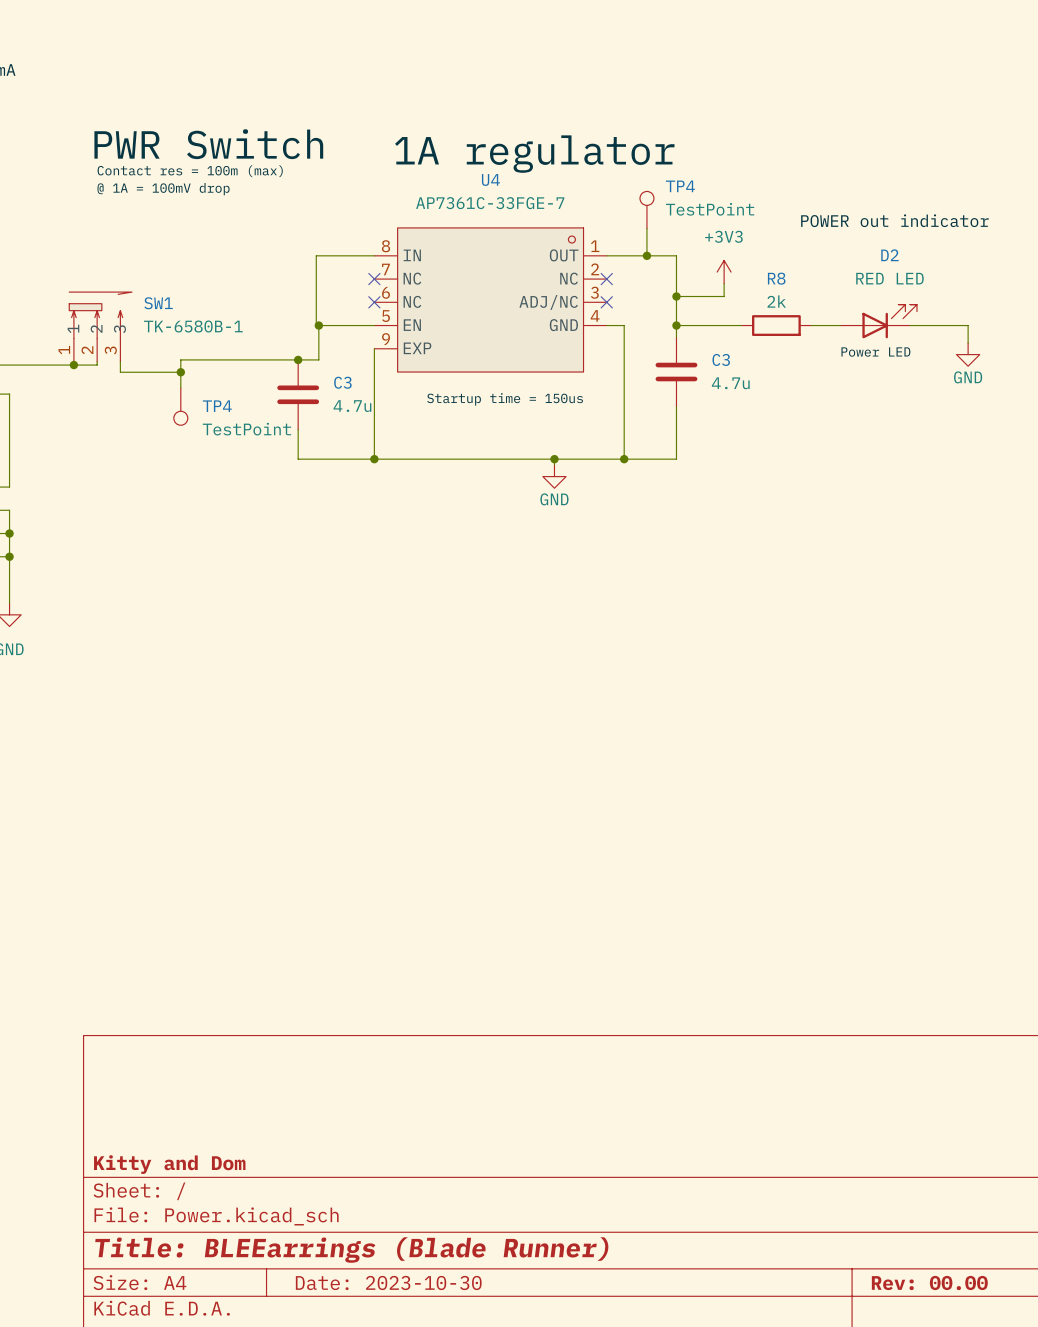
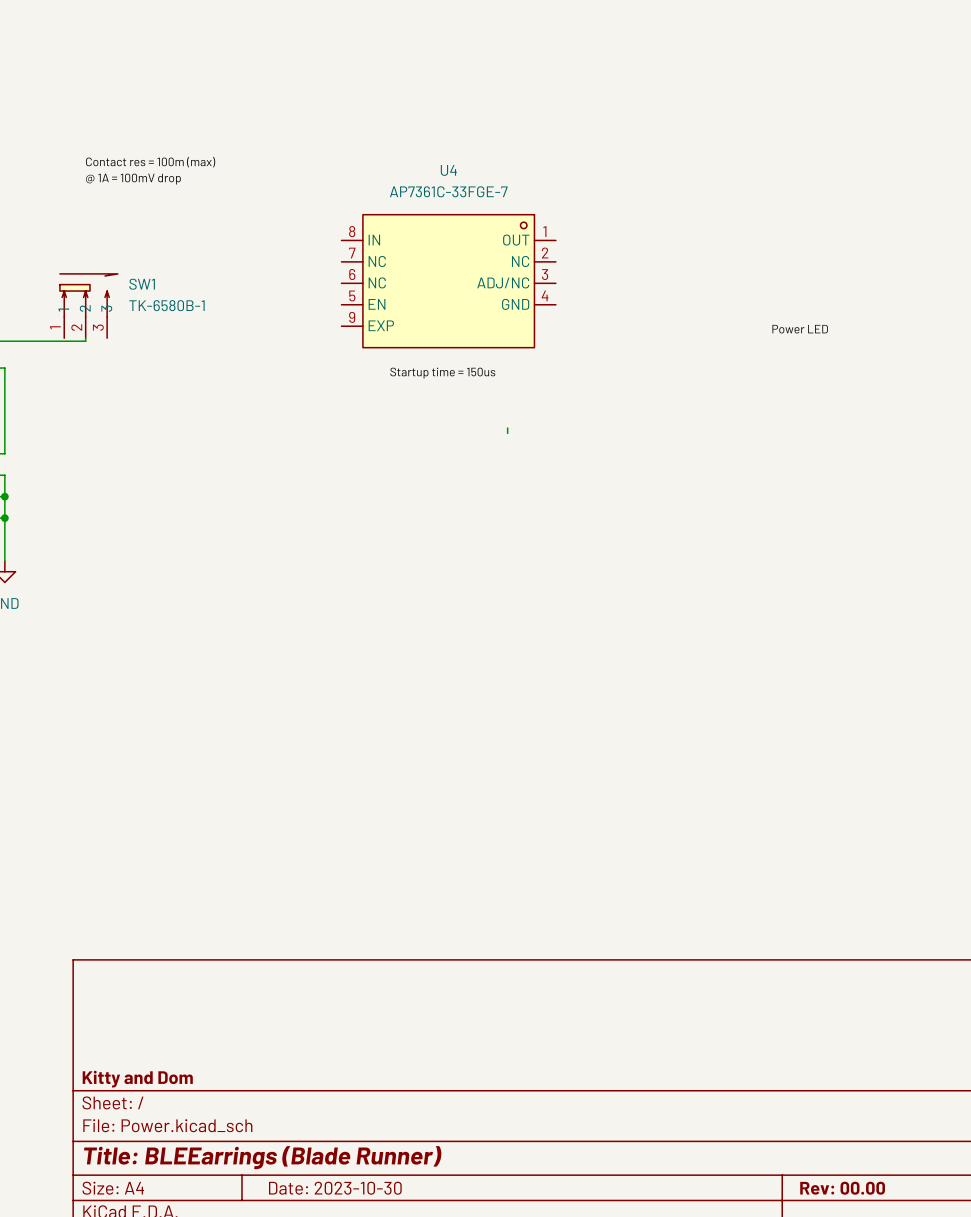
label: PWR Switch (208, 144) -> none
label: 1A regulator (534, 154) -> none
TP4: TestPoint (646, 210) -> none
label: POWER out indicator (894, 220) -> none
wire: (646, 228) (646, 255) -> none
wire: (374, 255) (316, 255) (316, 325) (374, 325) -> none
wire: (606, 255) (676, 255) (676, 337) -> none
junction: (646, 255) -> none
power symbol: +3V3 (724, 272) -> none
no-connect mark: (374, 279) -> none
no-connect mark: (606, 279) -> none
wire: (724, 283) (724, 296) (676, 296) -> none
junction: (676, 296) -> none
no-connect mark: (374, 302) -> none
no-connect mark: (606, 302) -> none
D2: RED LED (878, 321) -> none
wire: (318, 325) (318, 359) (180, 359) (180, 388) -> none
junction: (318, 325) -> none
wire: (606, 325) (624, 325) (624, 459) -> none
wire: (676, 325) (741, 325) -> none
junction: (676, 325) -> none
R8: 2k (776, 325) -> none
wire: (811, 325) (840, 325) -> none
wire: (910, 325) (968, 325) (968, 342) -> none
wire: (374, 348) (374, 459) -> none
power symbol: GND (968, 354) -> none
junction: (298, 359) -> none
wire: (120, 361) (120, 372) (180, 372) -> none
junction: (73, 365) -> none
junction: (180, 372) -> none
C3: 4.7u (676, 372) -> none
C3: 4.7u (298, 394) -> none
TP4: TestPoint (180, 406) -> none
wire: (676, 406) (676, 459) (298, 459) (298, 429) -> none
junction: (374, 459) -> none
junction: (554, 459) -> none
junction: (624, 459) -> none
power symbol: GND (554, 476) -> none

